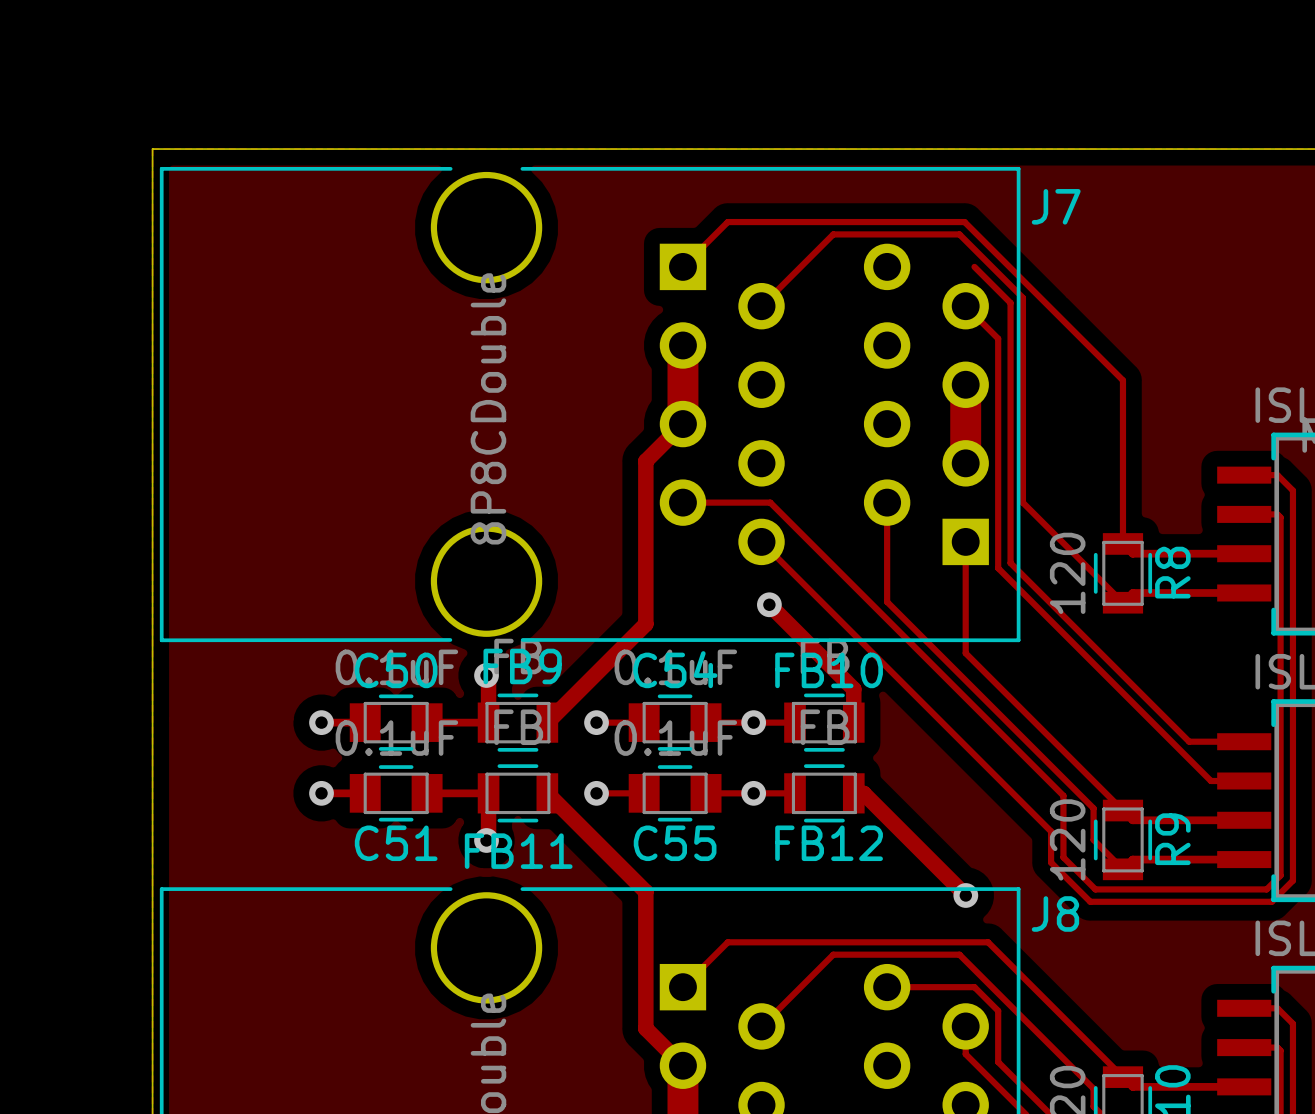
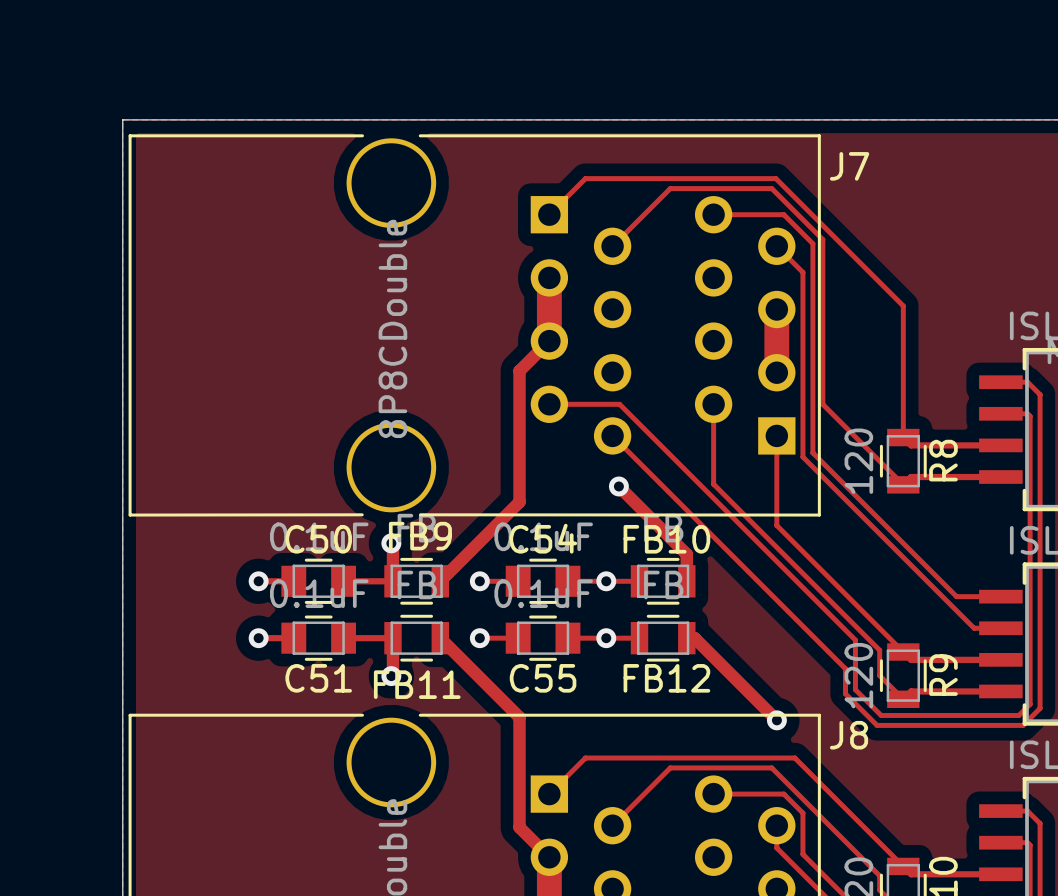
track: none -> (713, 214) (783, 214)

